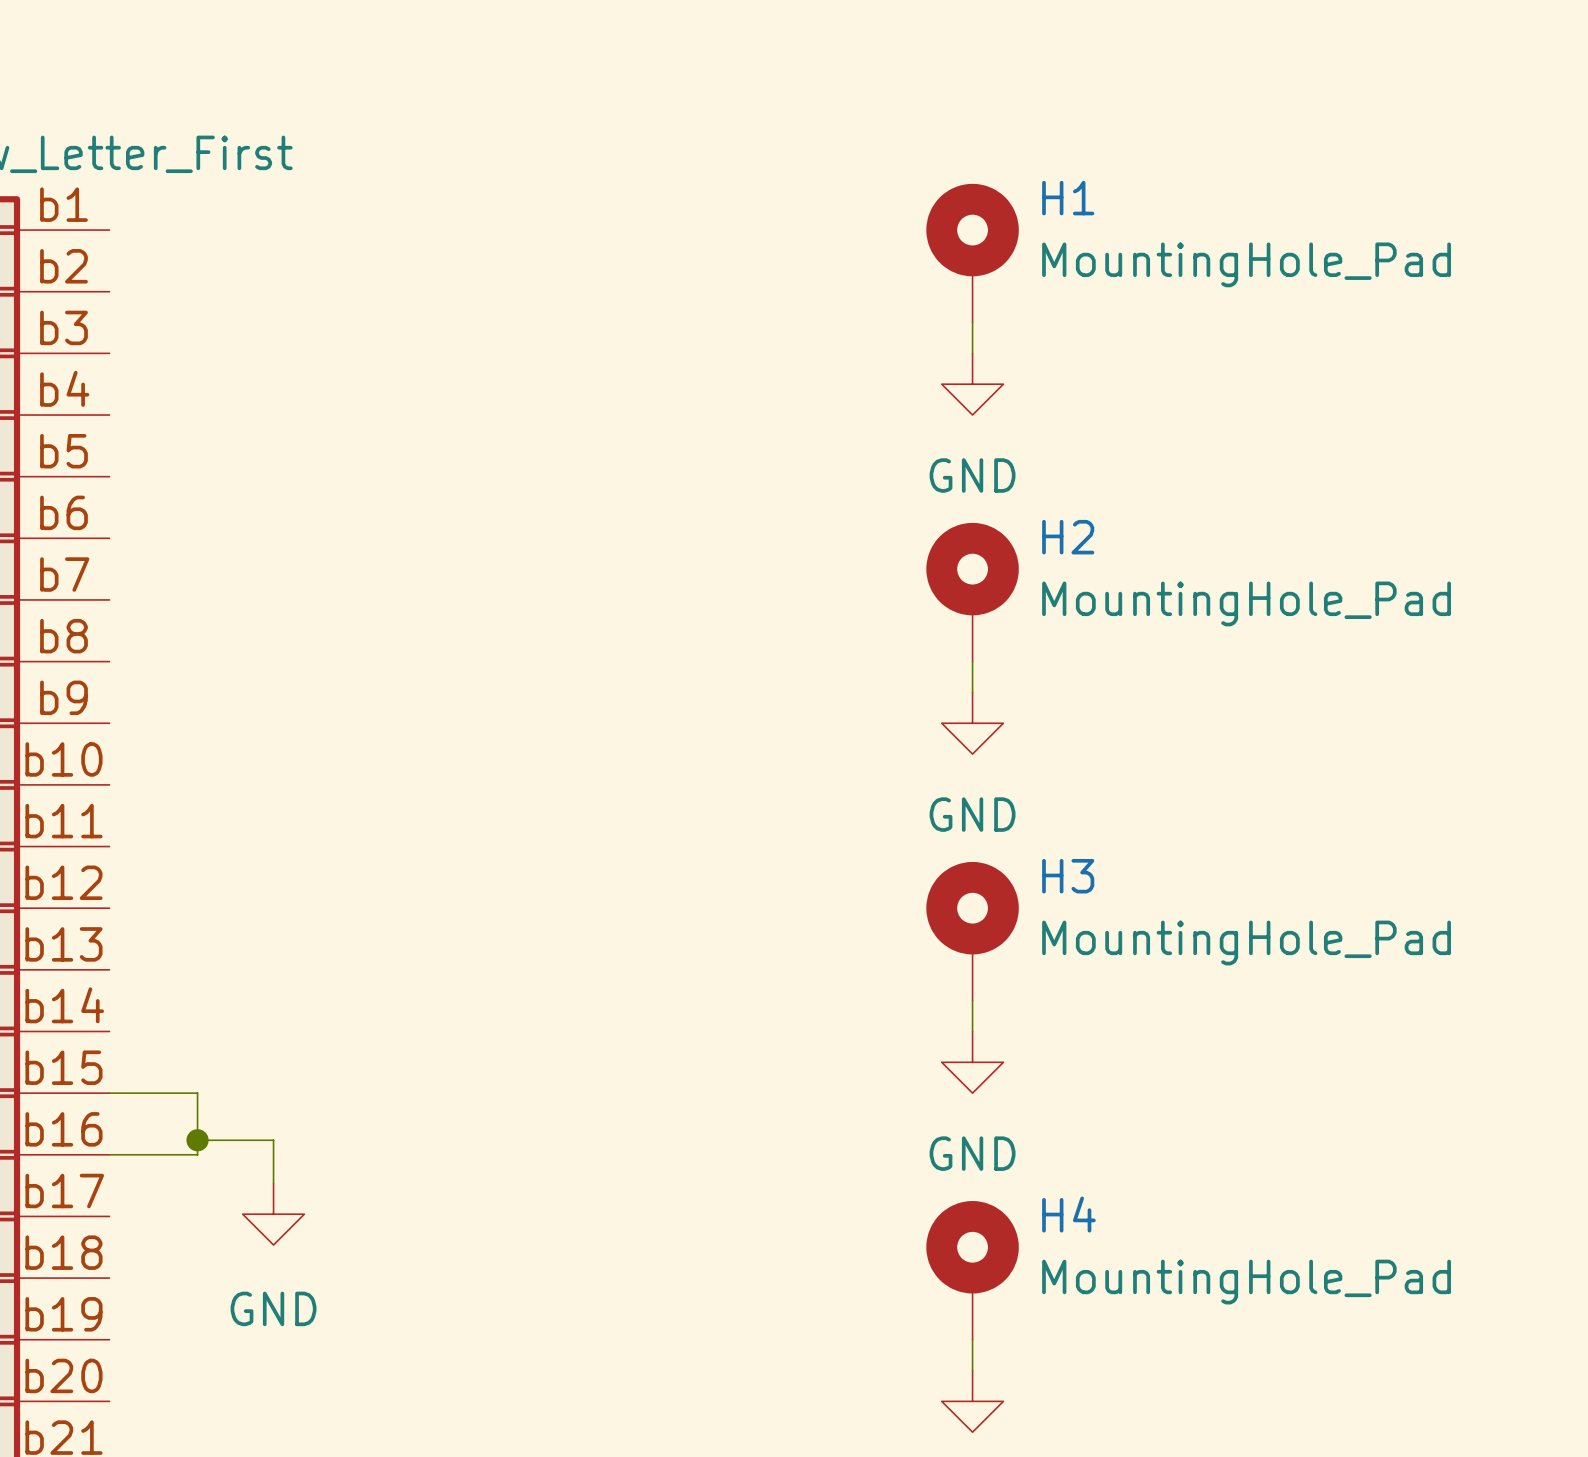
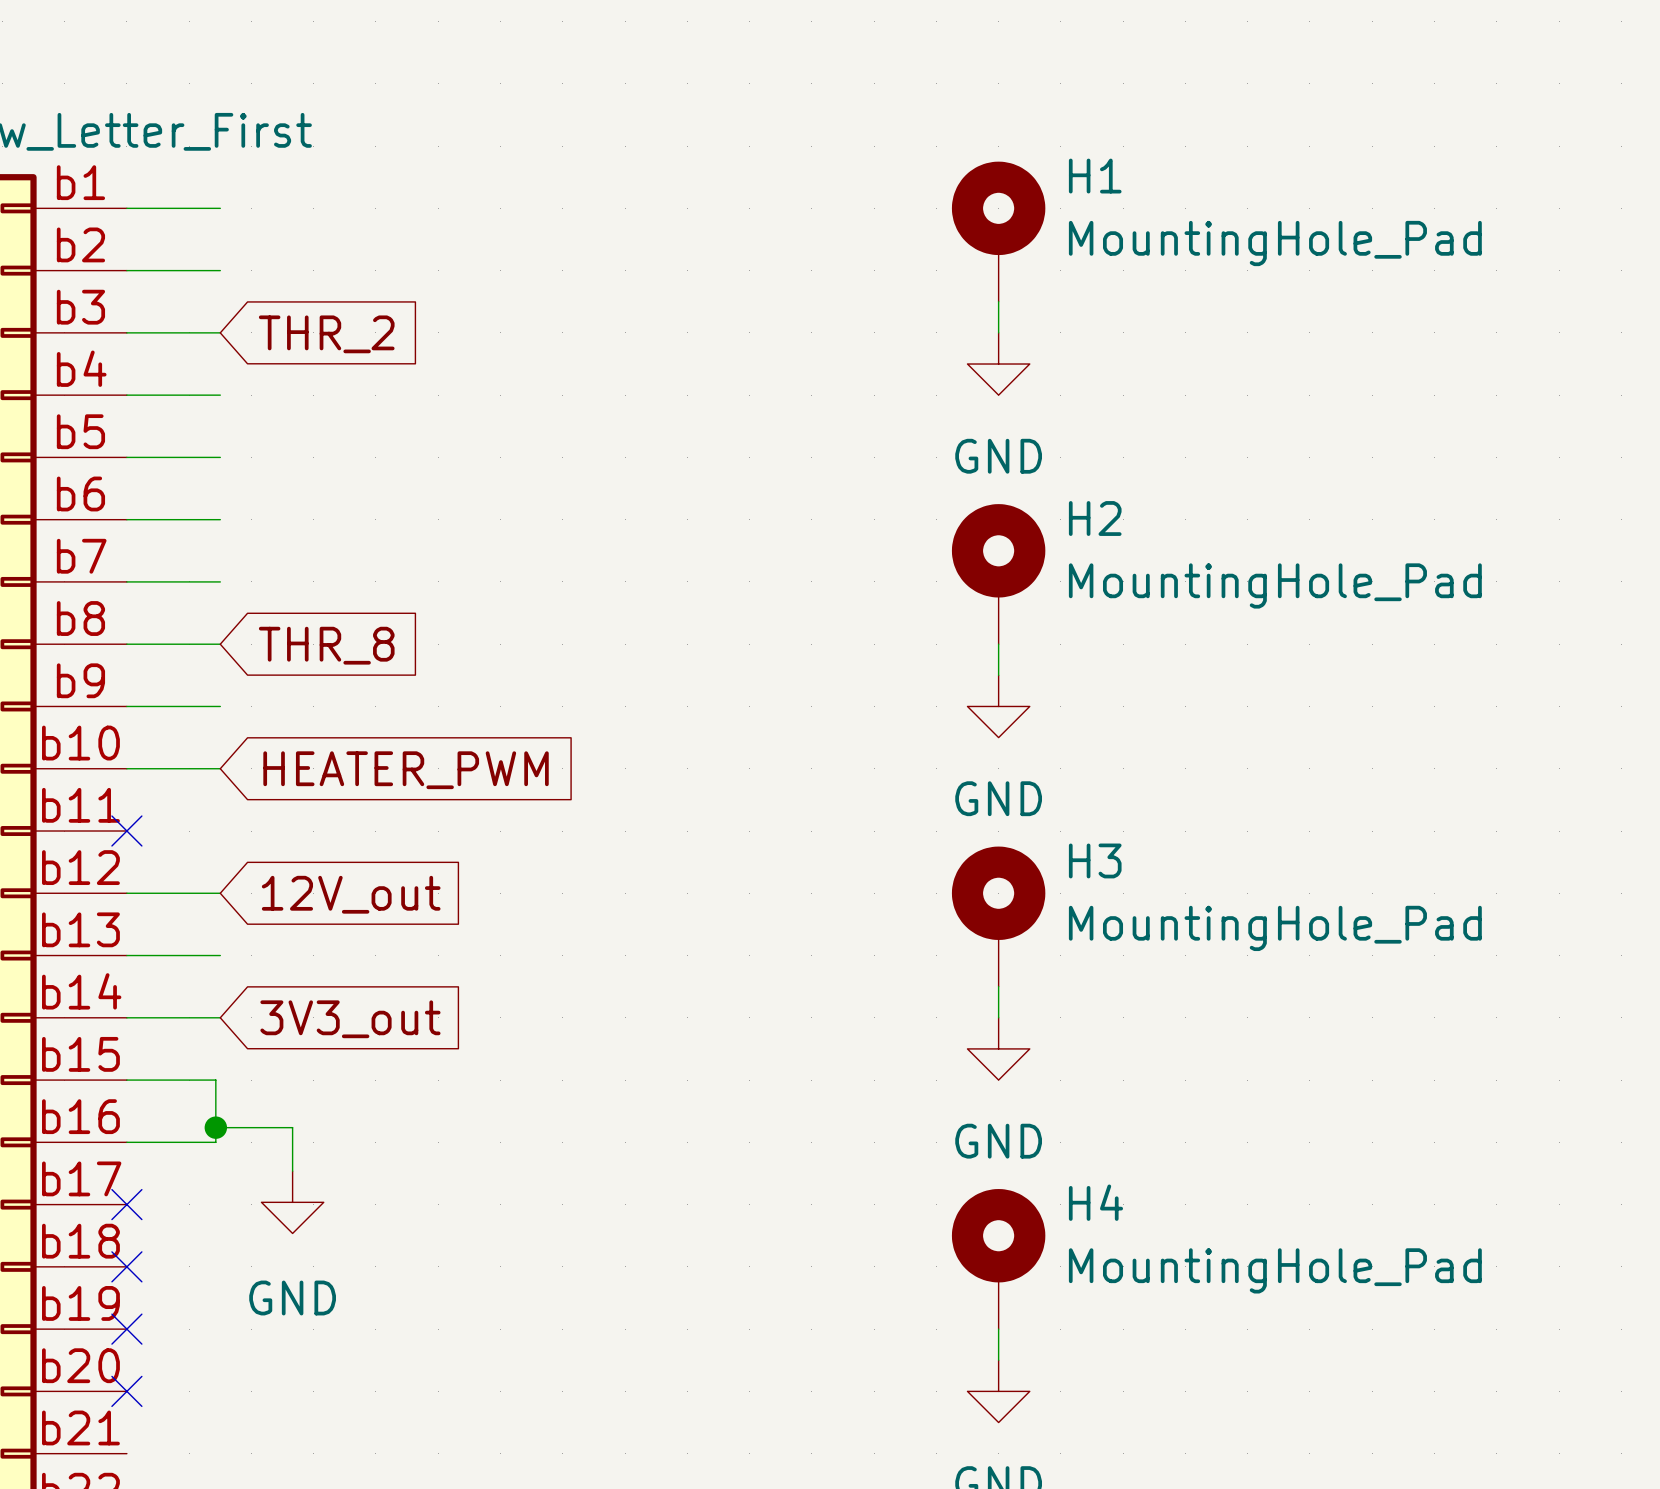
wire: none -> (126, 208) (220, 208)
wire: none -> (126, 270) (220, 270)
wire: none -> (126, 332) (220, 332)
global label: none -> THR_2 (326, 334)
wire: none -> (126, 395) (220, 395)
wire: none -> (126, 457) (220, 457)
wire: none -> (126, 519) (220, 519)
wire: none -> (126, 581) (220, 581)
wire: none -> (126, 644) (220, 644)
global label: none -> THR_8 (326, 645)
wire: none -> (126, 706) (220, 706)
wire: none -> (126, 768) (220, 768)
global label: none -> HEATER_PWM (406, 770)
no-connect mark: none -> (126, 831)
wire: none -> (126, 893) (220, 893)
global label: none -> 12V_out (351, 894)
wire: none -> (126, 955) (220, 955)
wire: none -> (126, 1017) (220, 1017)
global label: none -> 3V3_out (350, 1019)
no-connect mark: none -> (126, 1204)
no-connect mark: none -> (126, 1266)
no-connect mark: none -> (126, 1329)
no-connect mark: none -> (126, 1391)

